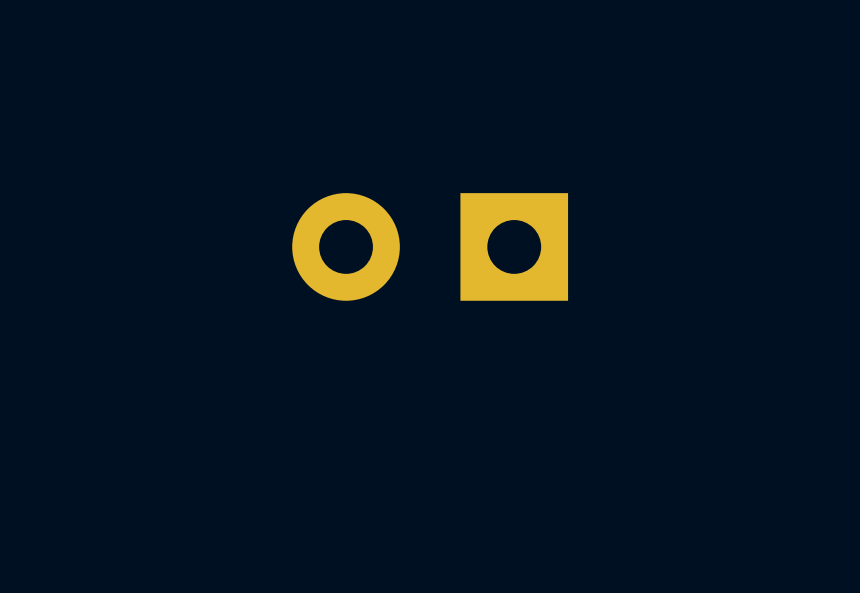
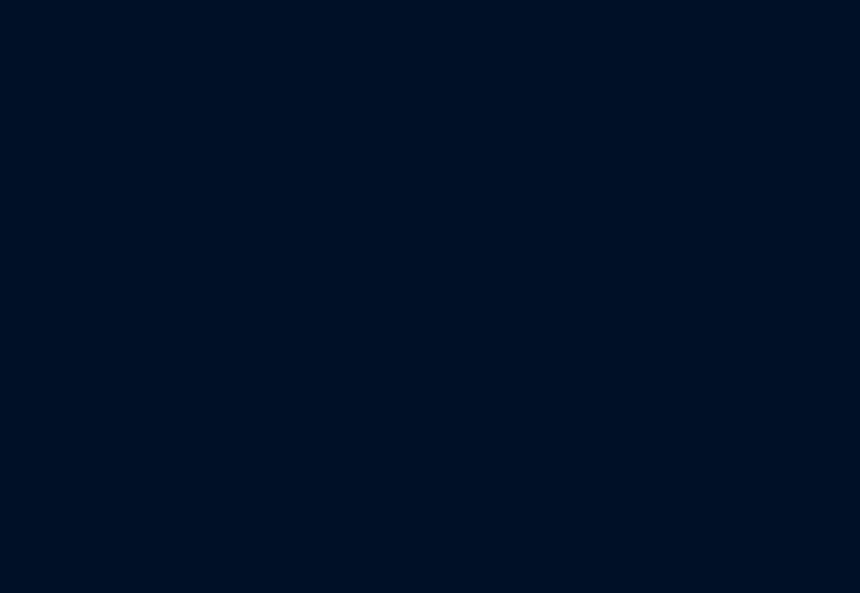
part: (430, 246) -> none

